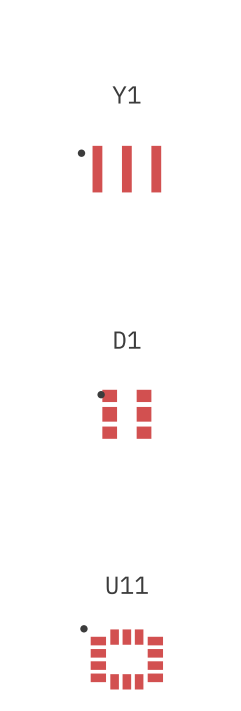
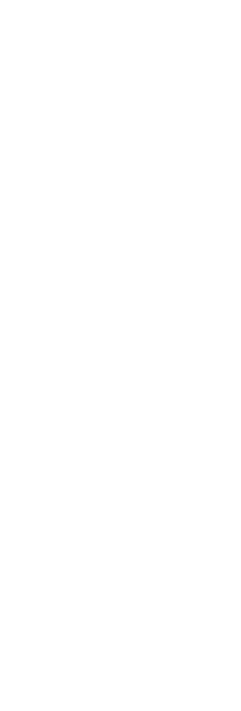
Y1: (119, 169) -> none
D1: (124, 414) -> none
U11: (121, 657) -> none

